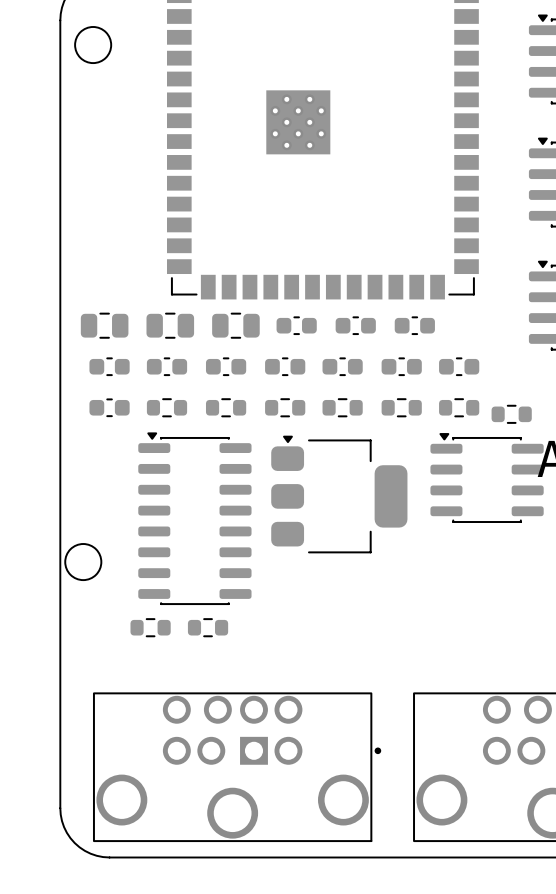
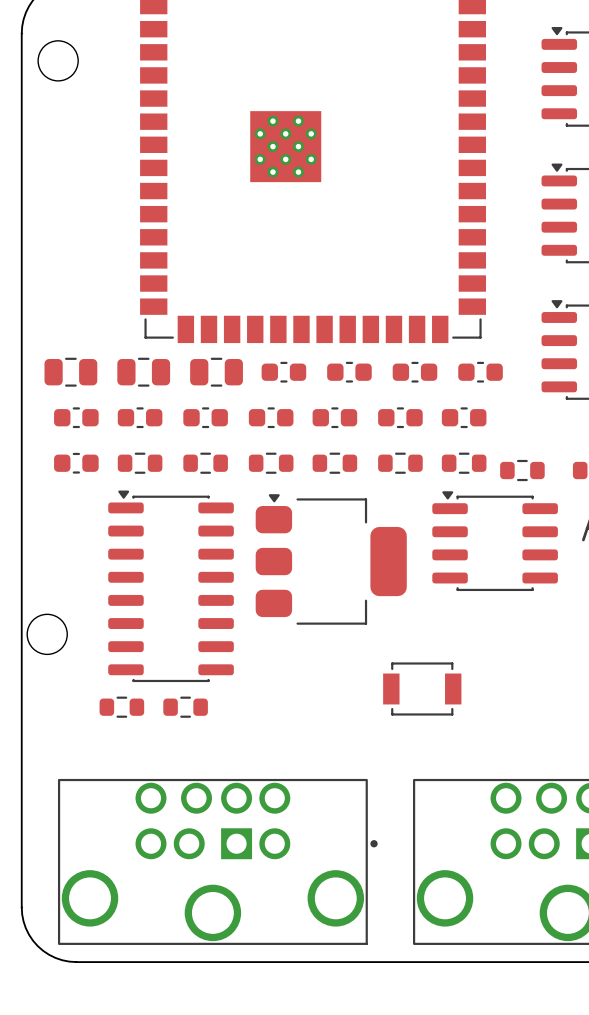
part: none -> (480, 372)
part: none -> (422, 688)

